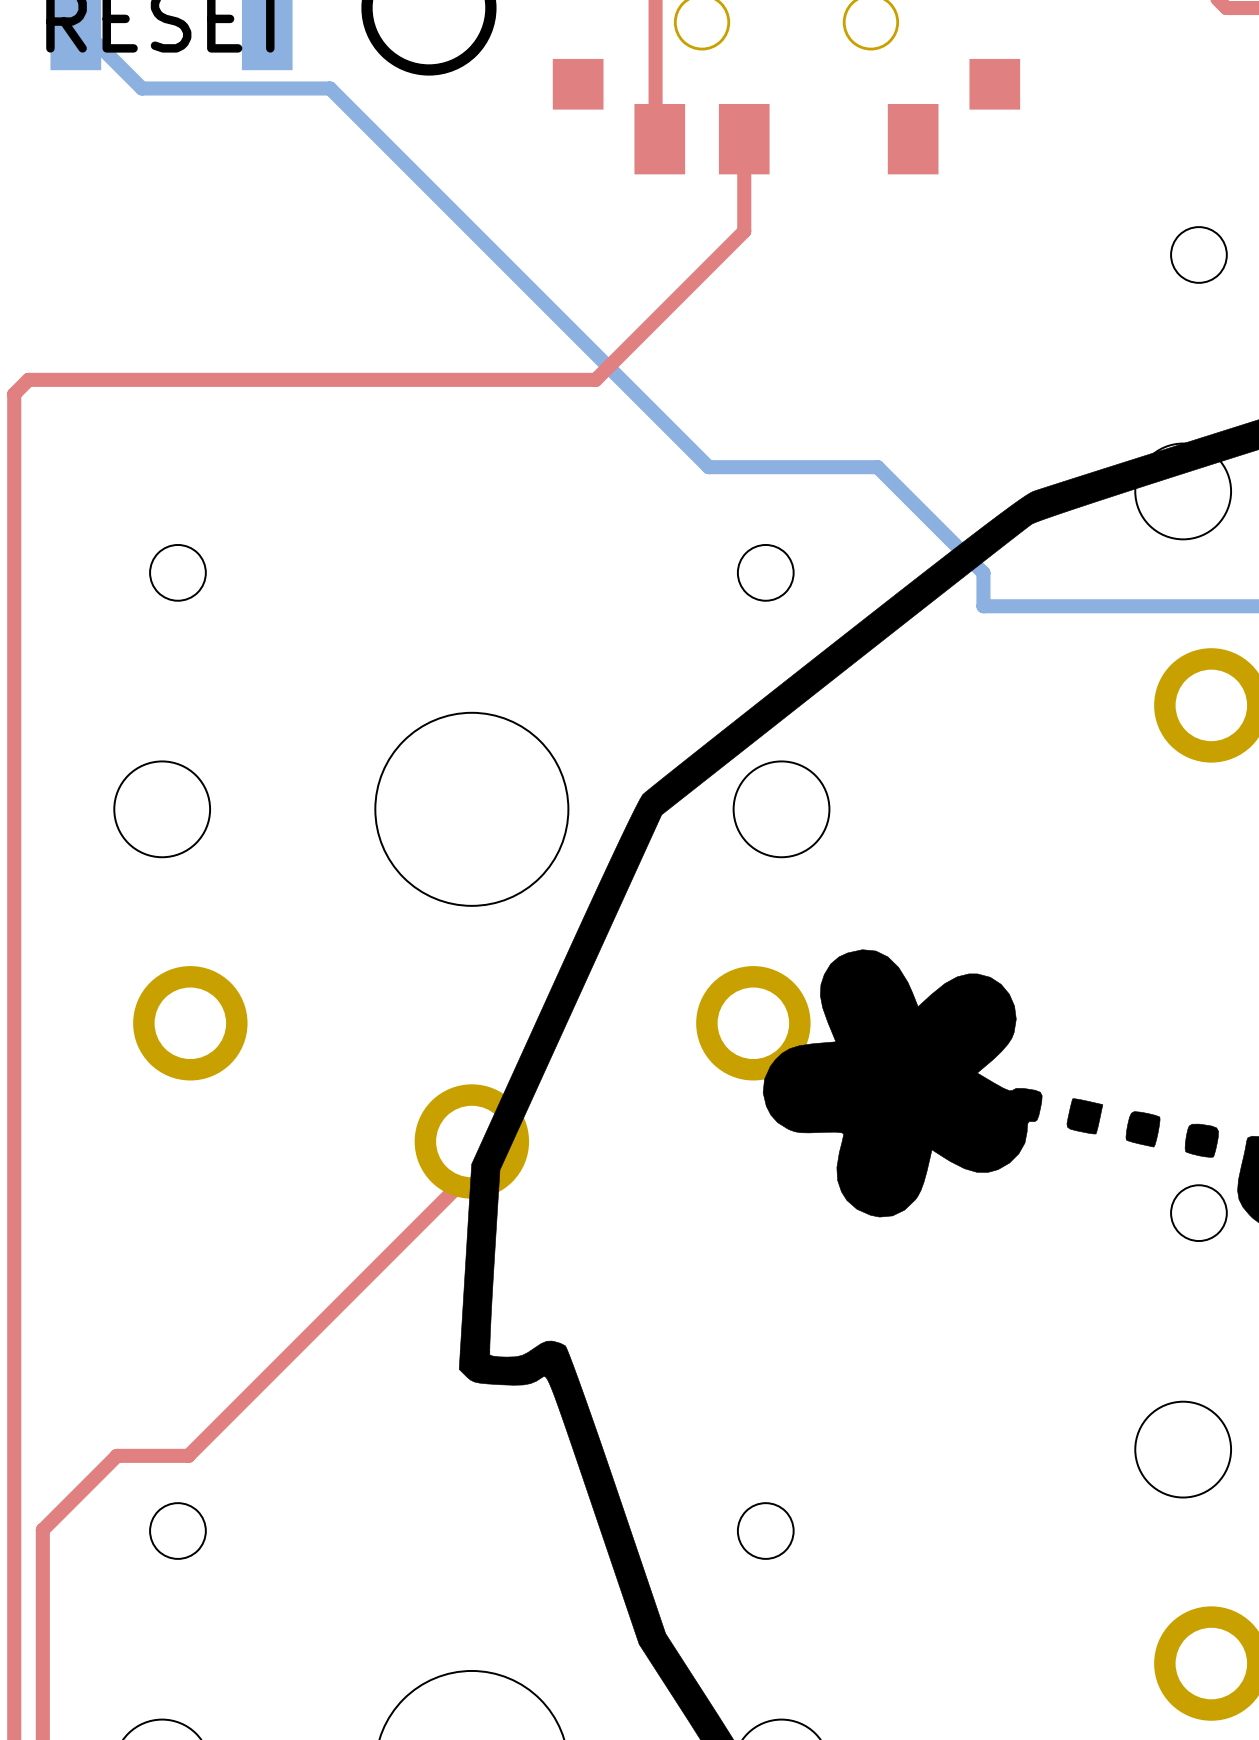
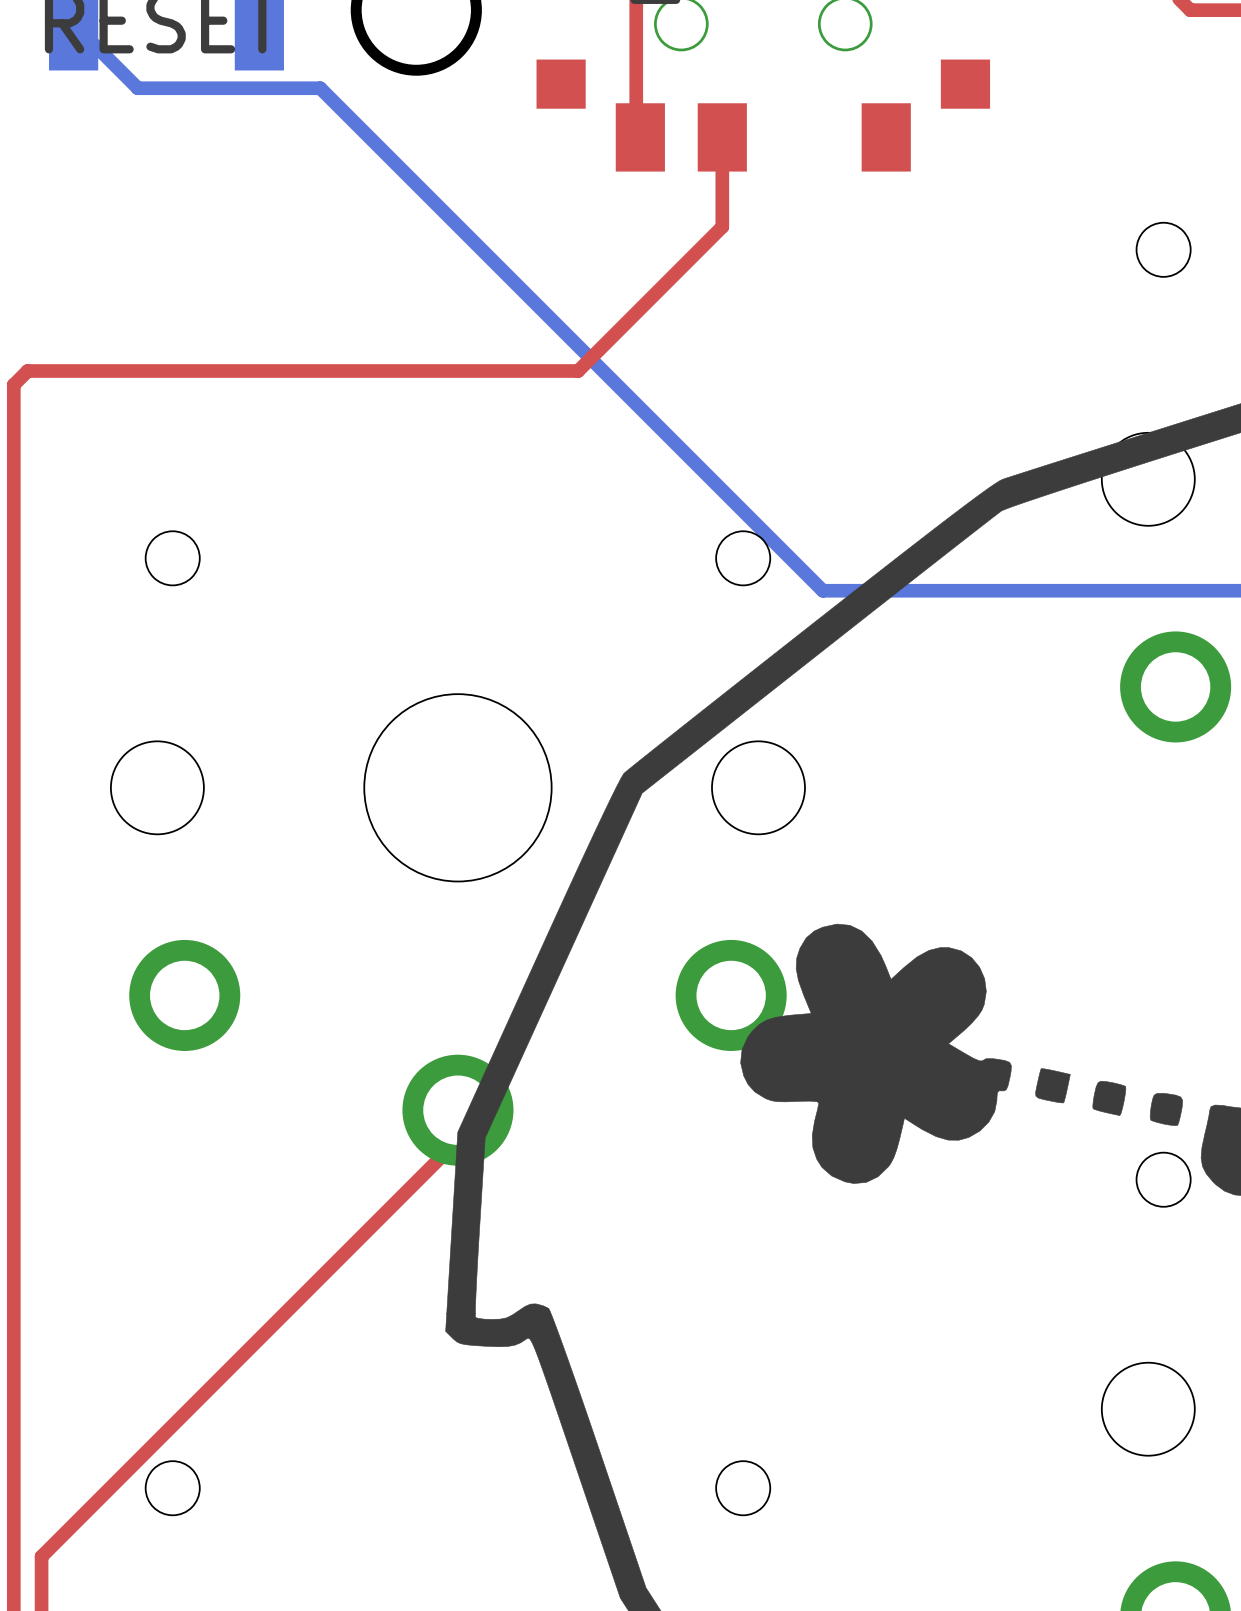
bottom track: (708, 467) (877, 467) (983, 573) (983, 606) -> (687, 455) (822, 590) (954, 590)
top track: (188, 1455) (116, 1455) (42, 1530) (42, 1601) -> (182, 1415) (41, 1556)

